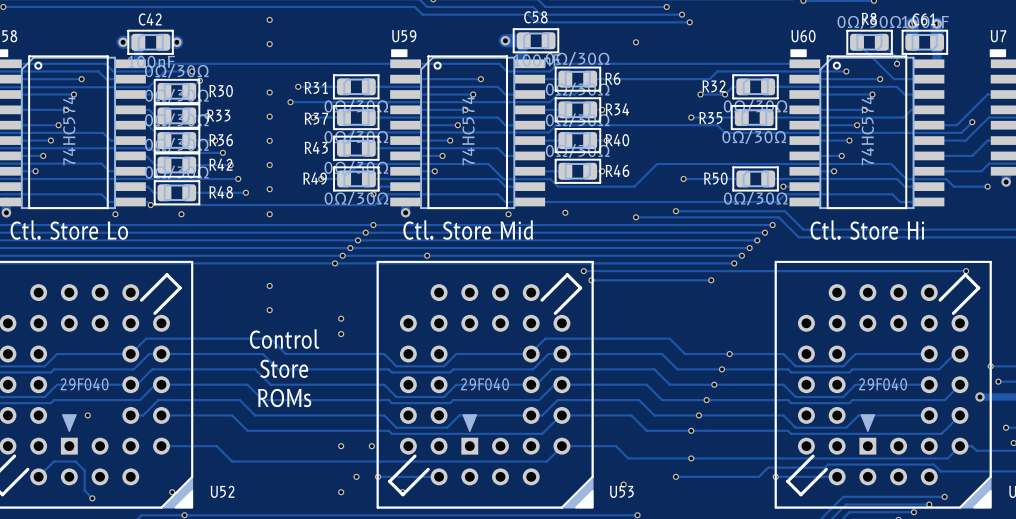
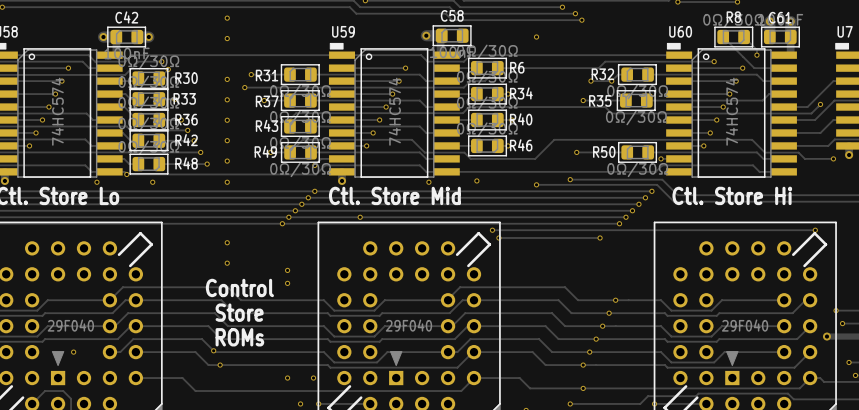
via: none -> (213, 350)
via: none -> (220, 365)

